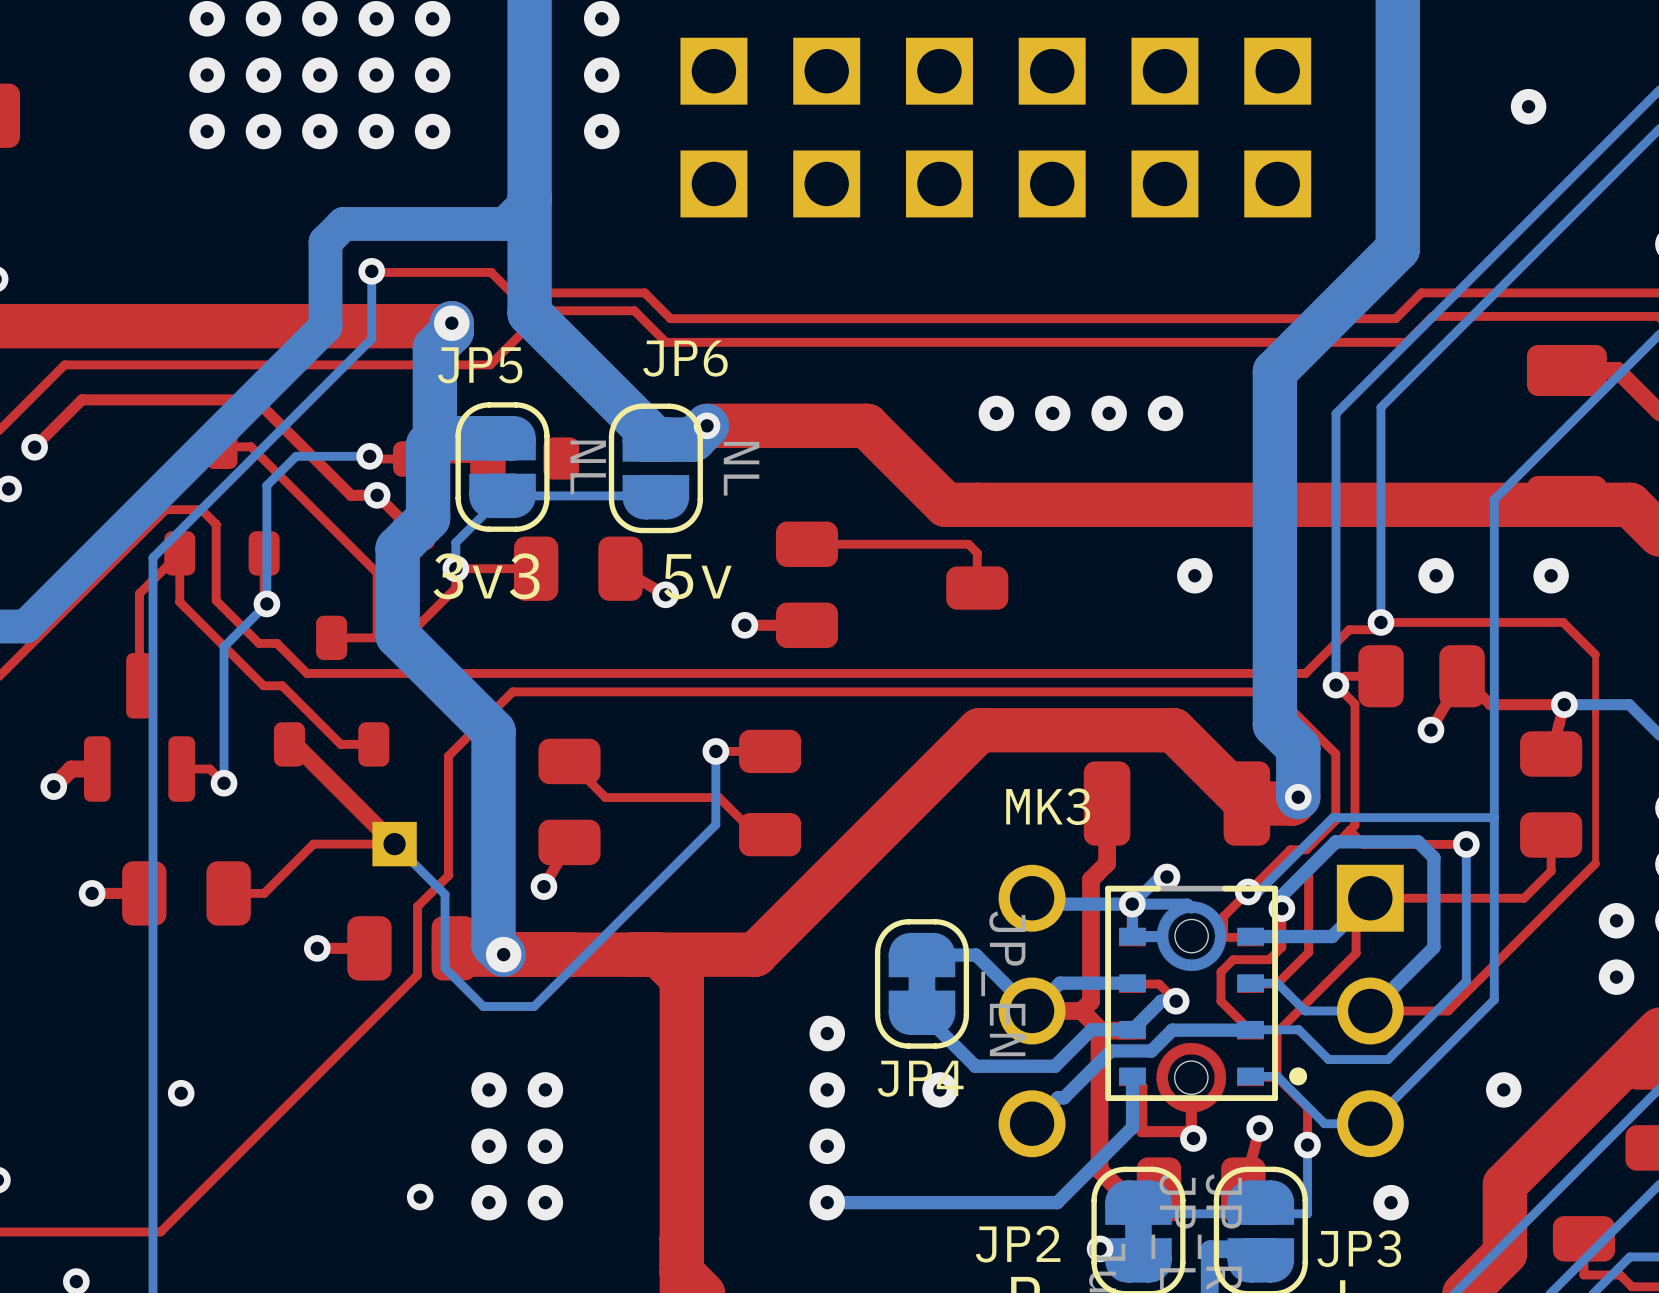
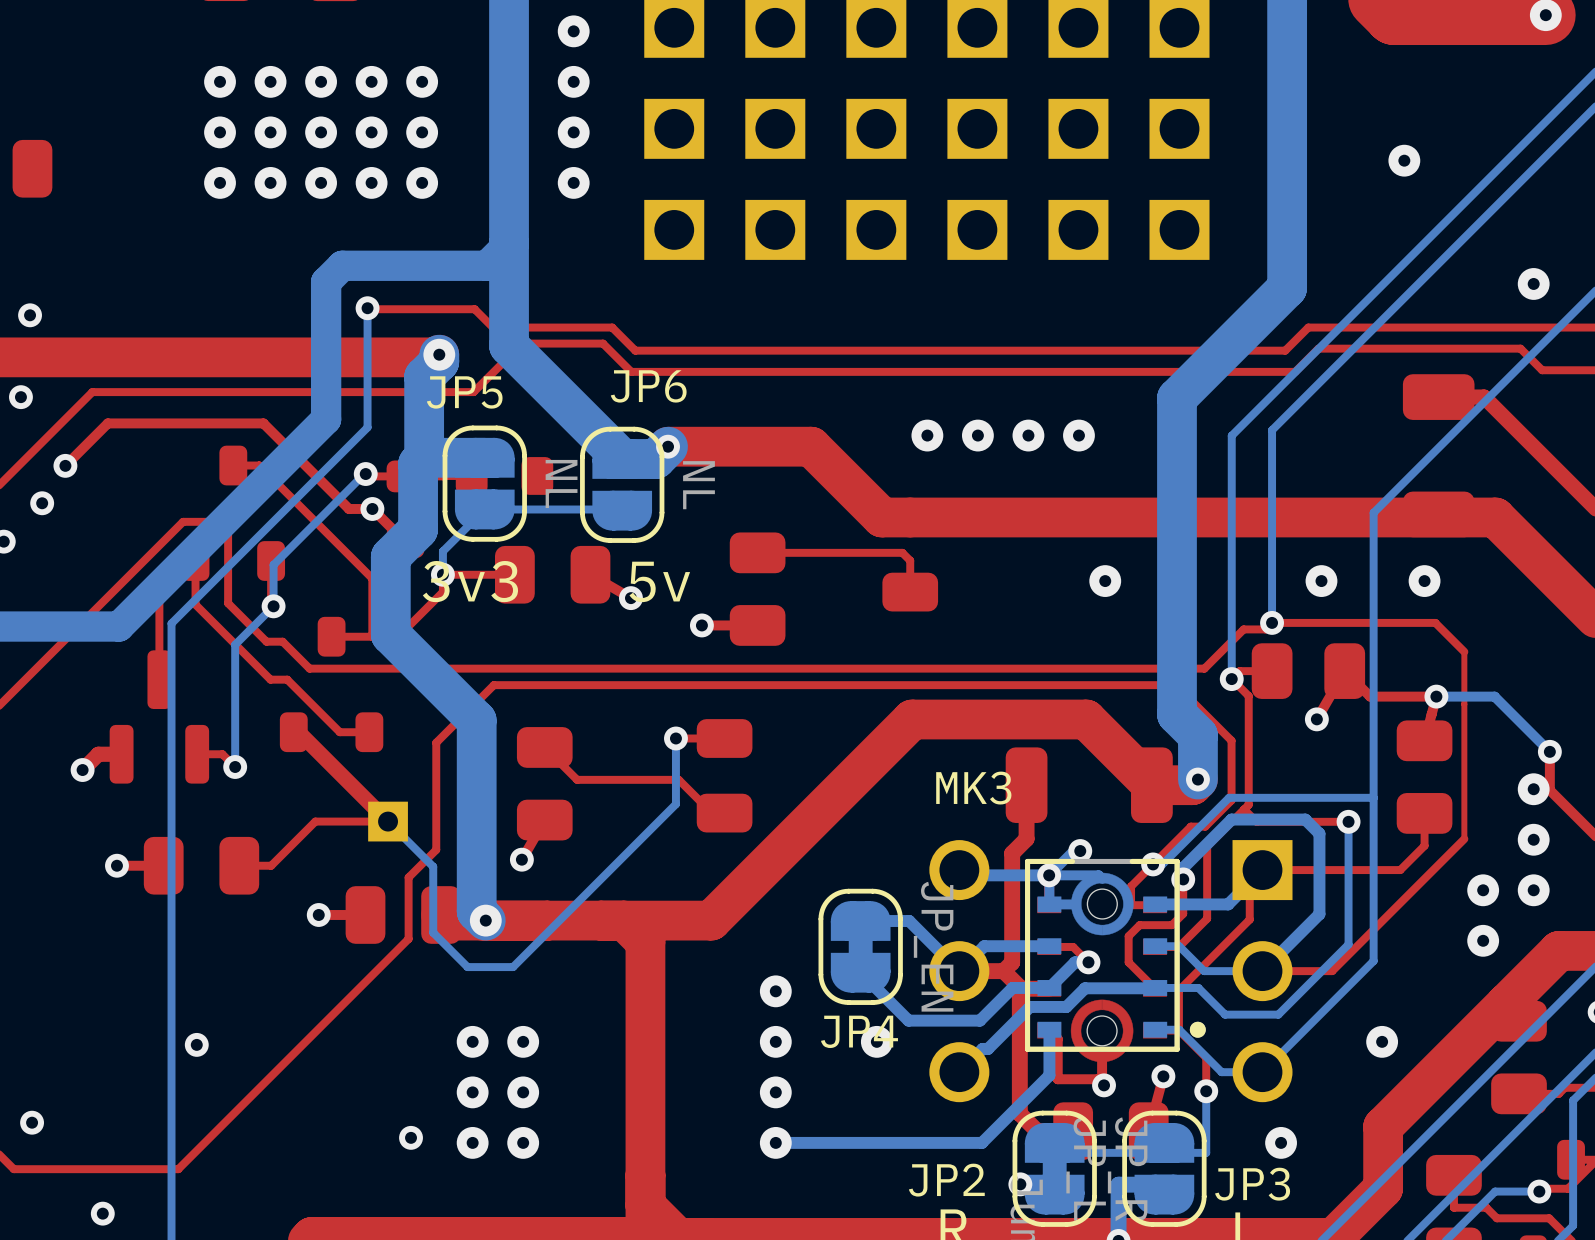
bottom track: (325, 326) (25, 626) -> (326, 357) (326, 419) (118, 626) (57, 626)
bottom track: (371, 338) (153, 557) (153, 623) -> (367, 368) (367, 427) (171, 623)
bottom track: (368, 456) (296, 456) (266, 485) (266, 557) -> (364, 474) (273, 564)

